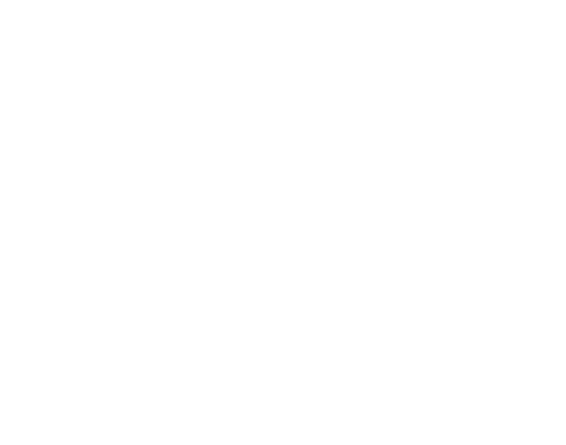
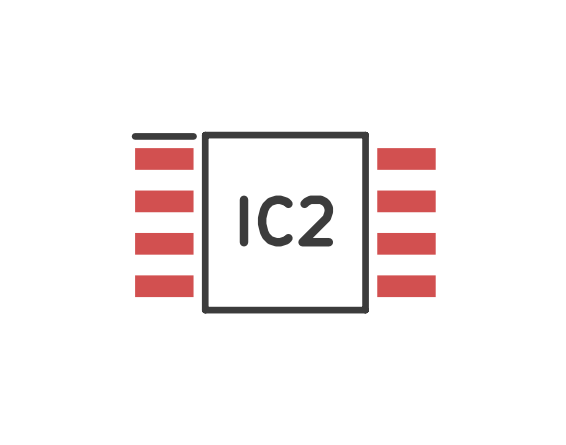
IC2: none -> (283, 222)

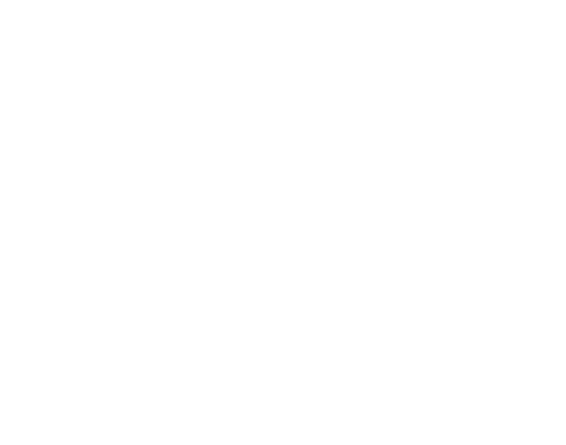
IC2: (283, 222) -> none

